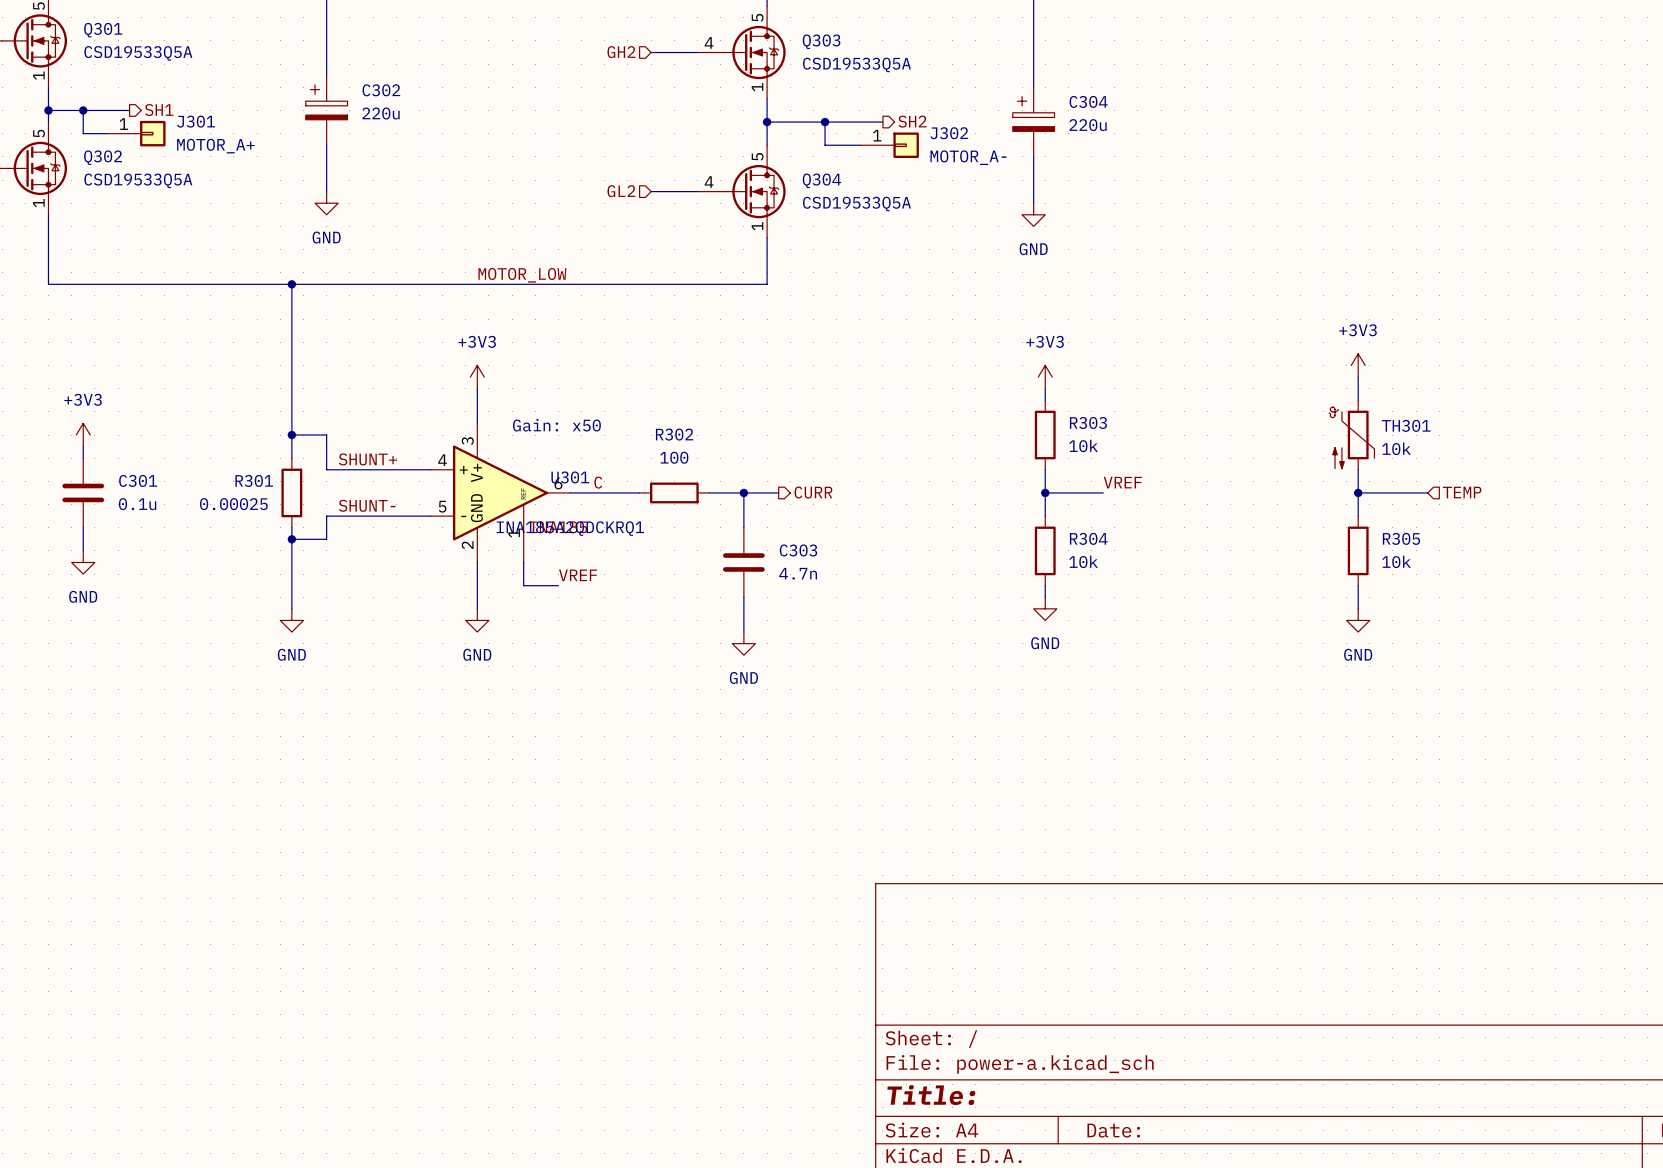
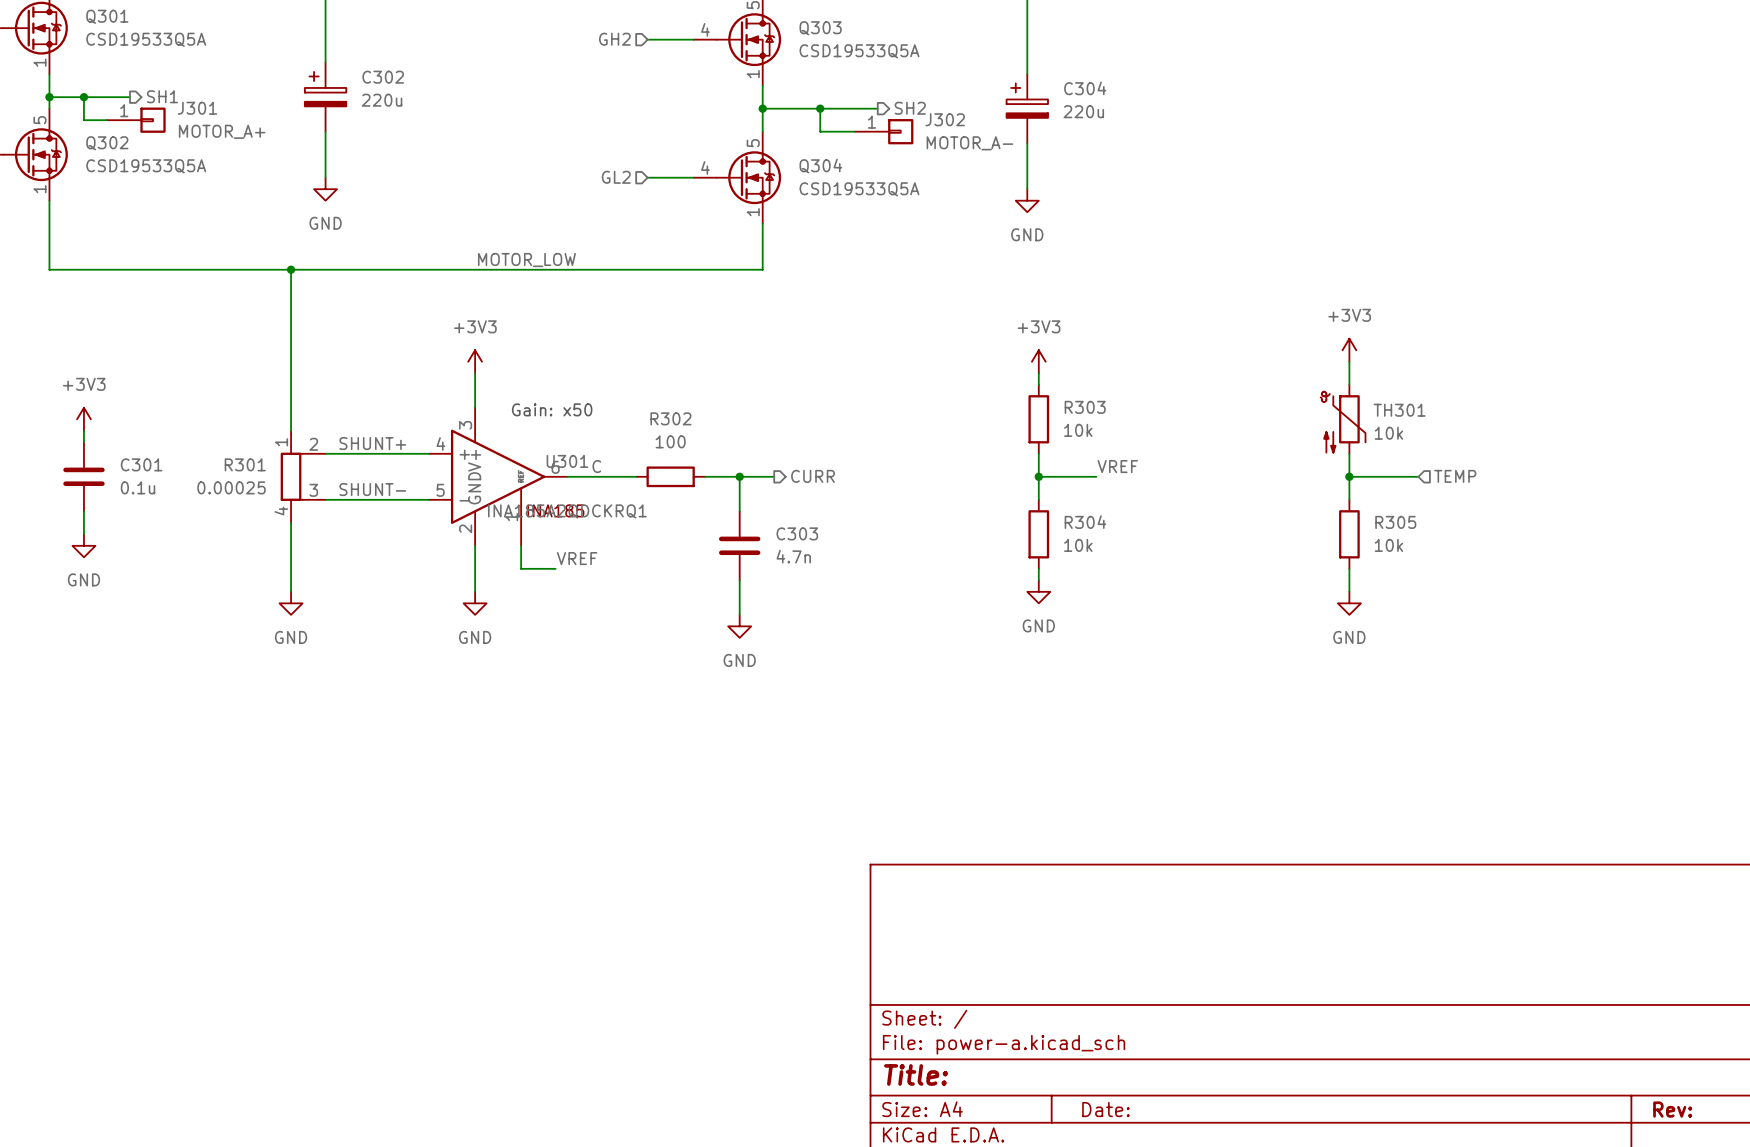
wire: (291, 435) (326, 435) (326, 469) -> none
junction: (291, 435) -> none
R301 symbol: [281, 458, 303, 528] -> [280, 430, 326, 523]
R301 name position: R301 (254, 480) -> R301 (245, 464)
R301 value position: 0.00025 (233, 504) -> 0.00025 (231, 487)
wire: (326, 516) (326, 539) (291, 539) (291, 527) -> none
junction: (291, 539) -> none

